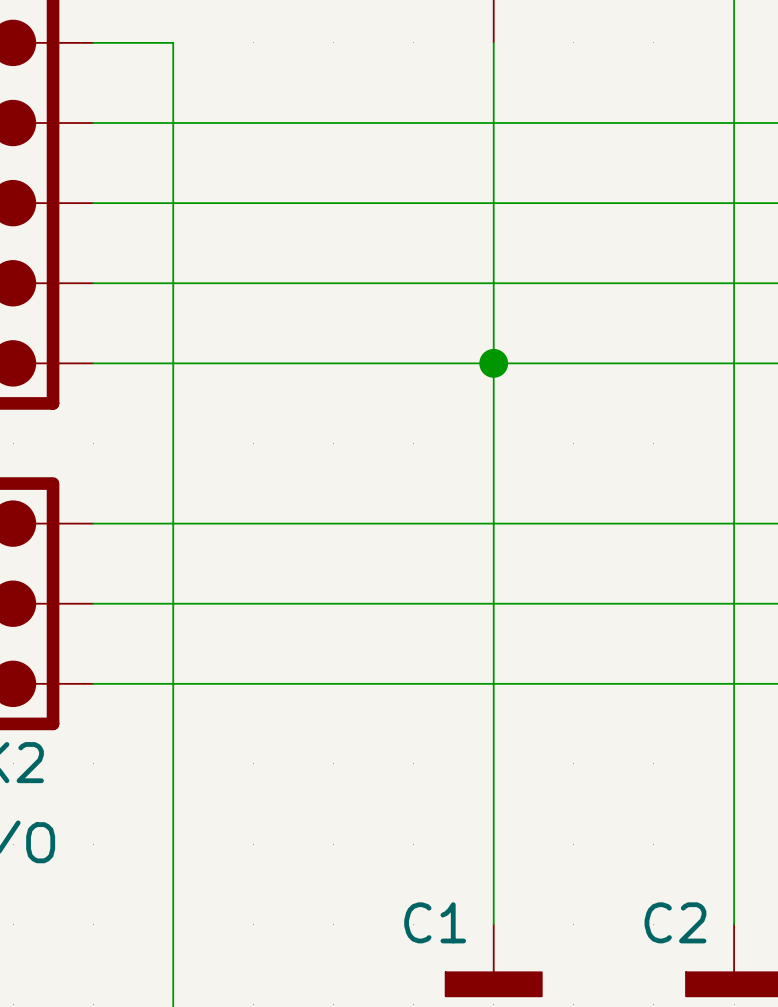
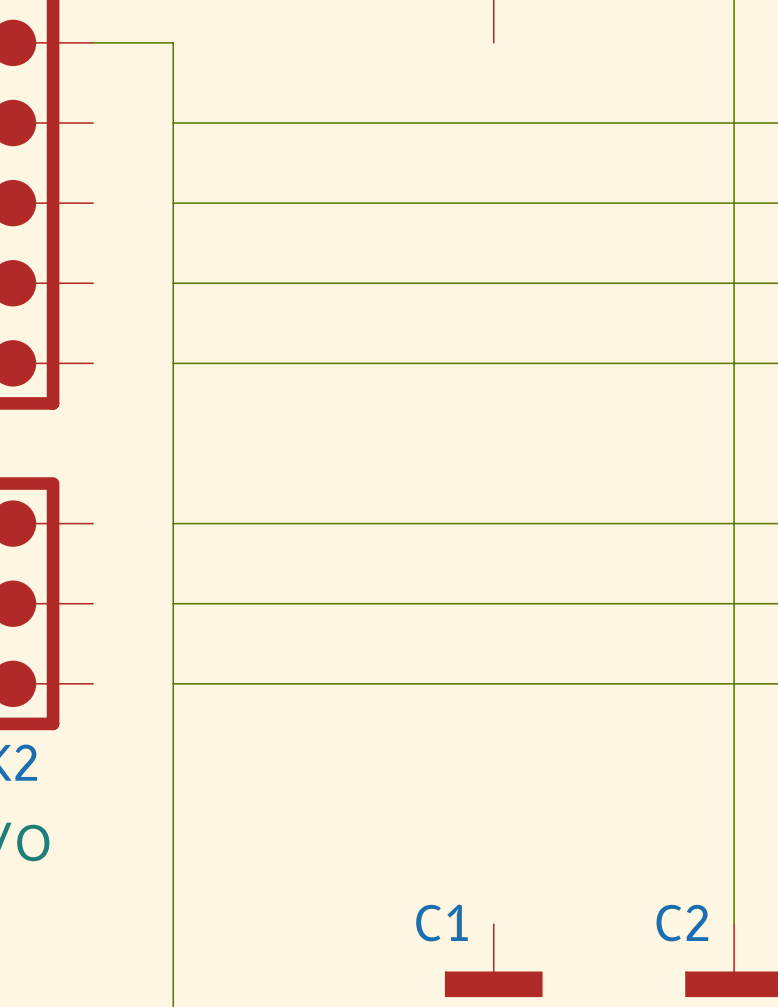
wire: (493, 42) (493, 924) -> none
wire: (93, 123) (173, 123) -> none
wire: (93, 203) (173, 203) -> none
wire: (93, 283) (173, 283) -> none
wire: (93, 363) (173, 363) -> none
junction: (493, 363) -> none
wire: (93, 523) (173, 523) -> none
wire: (93, 603) (173, 603) -> none
wire: (93, 683) (173, 683) -> none

